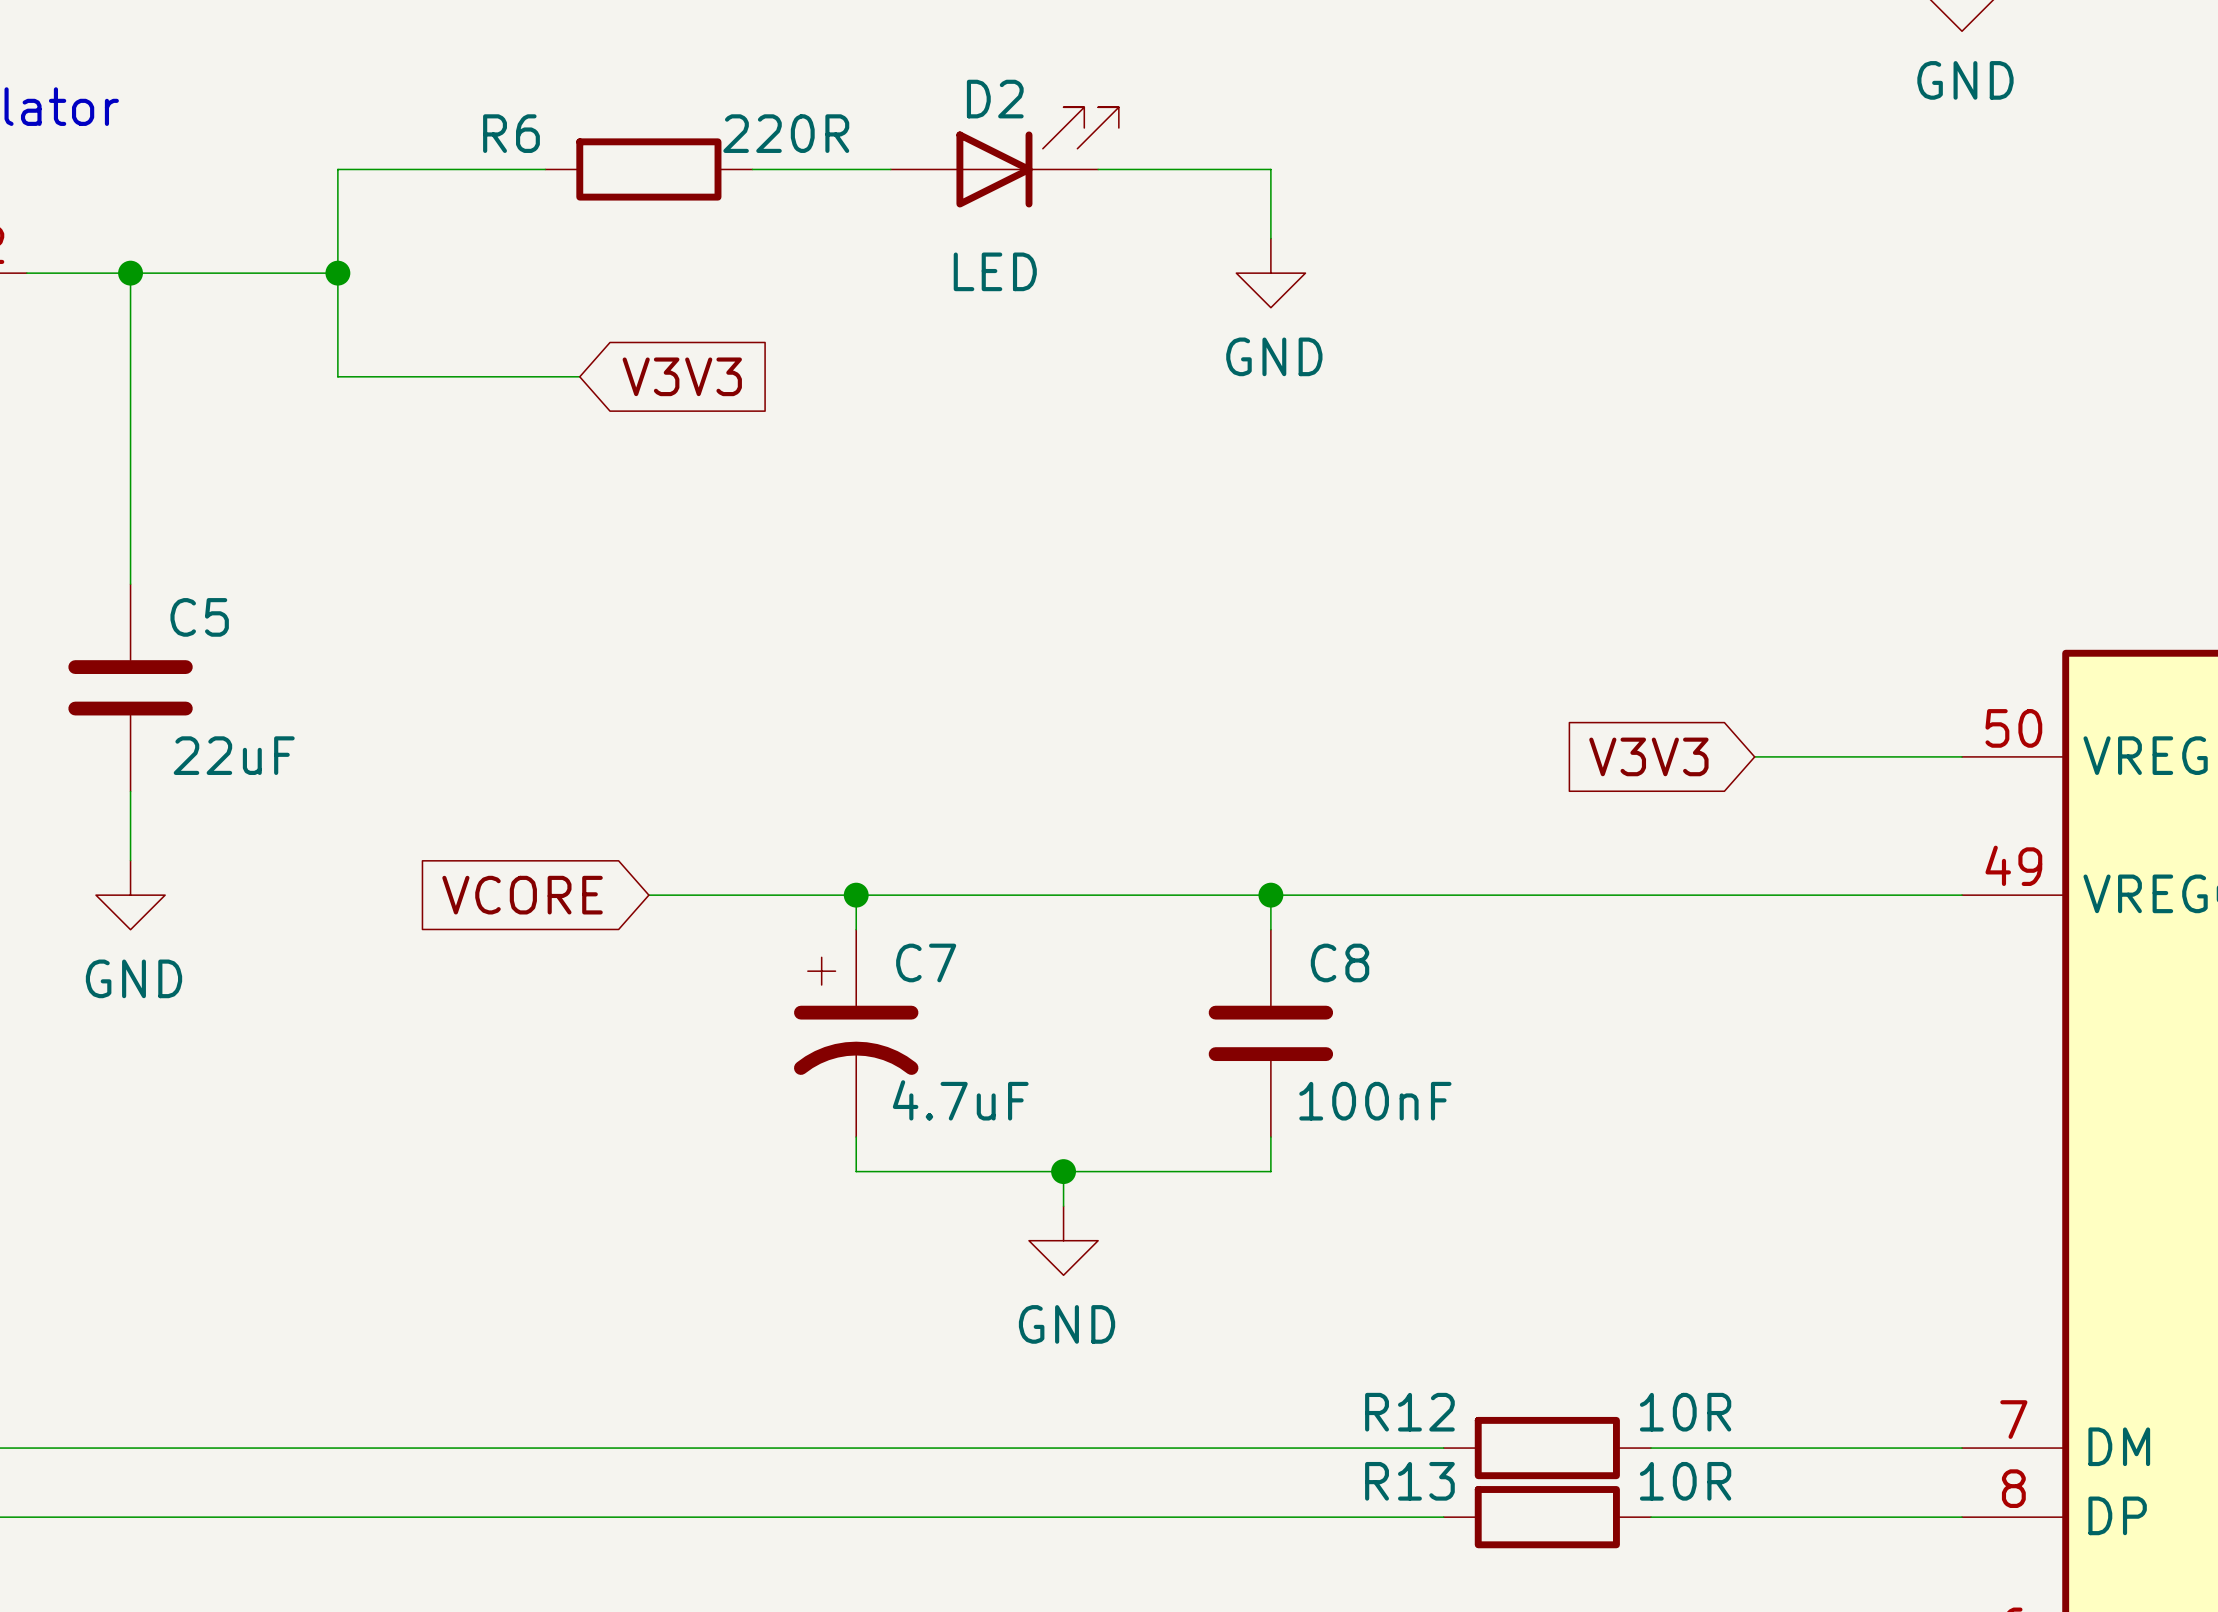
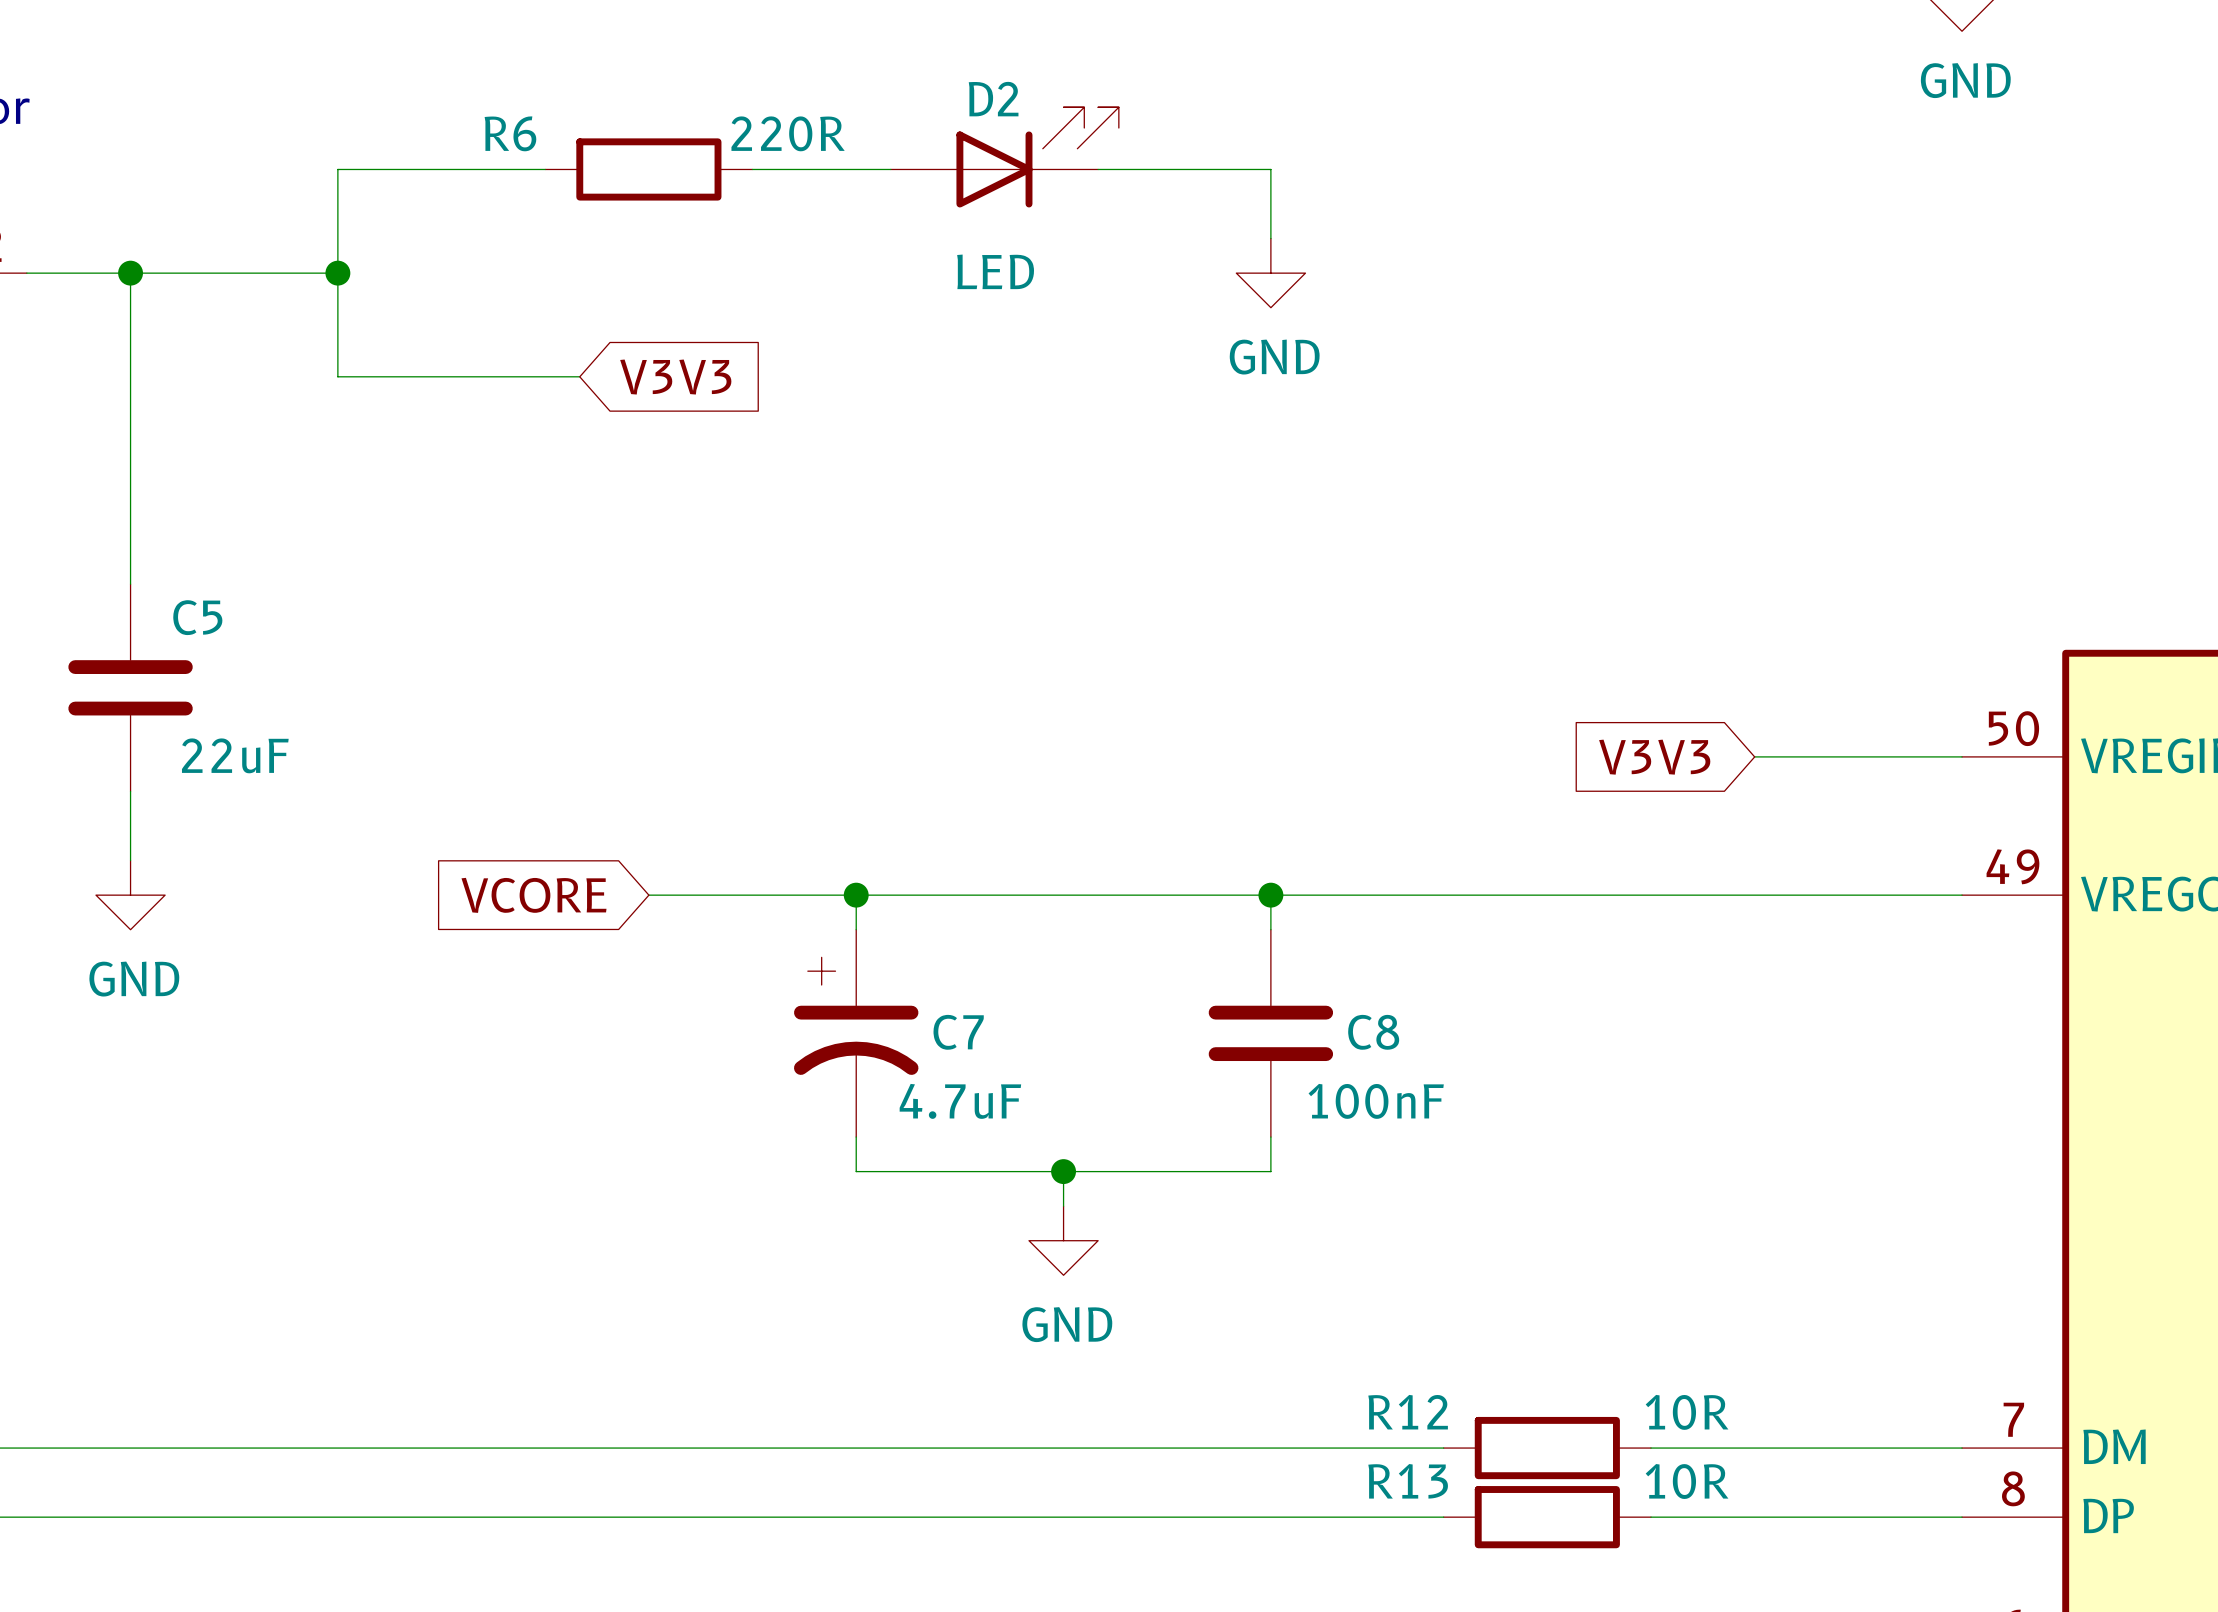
C7 name position: C7 (926, 962) -> C7 (958, 1032)
C8 name position: C8 (1340, 962) -> C8 (1373, 1032)

